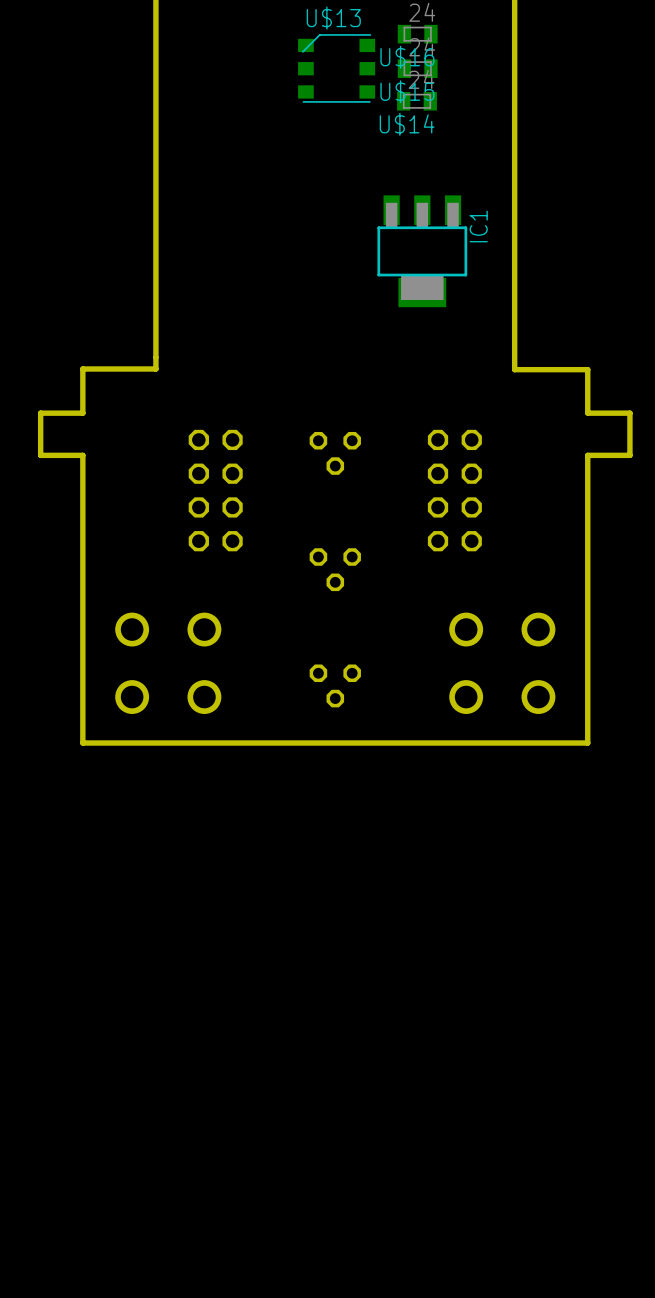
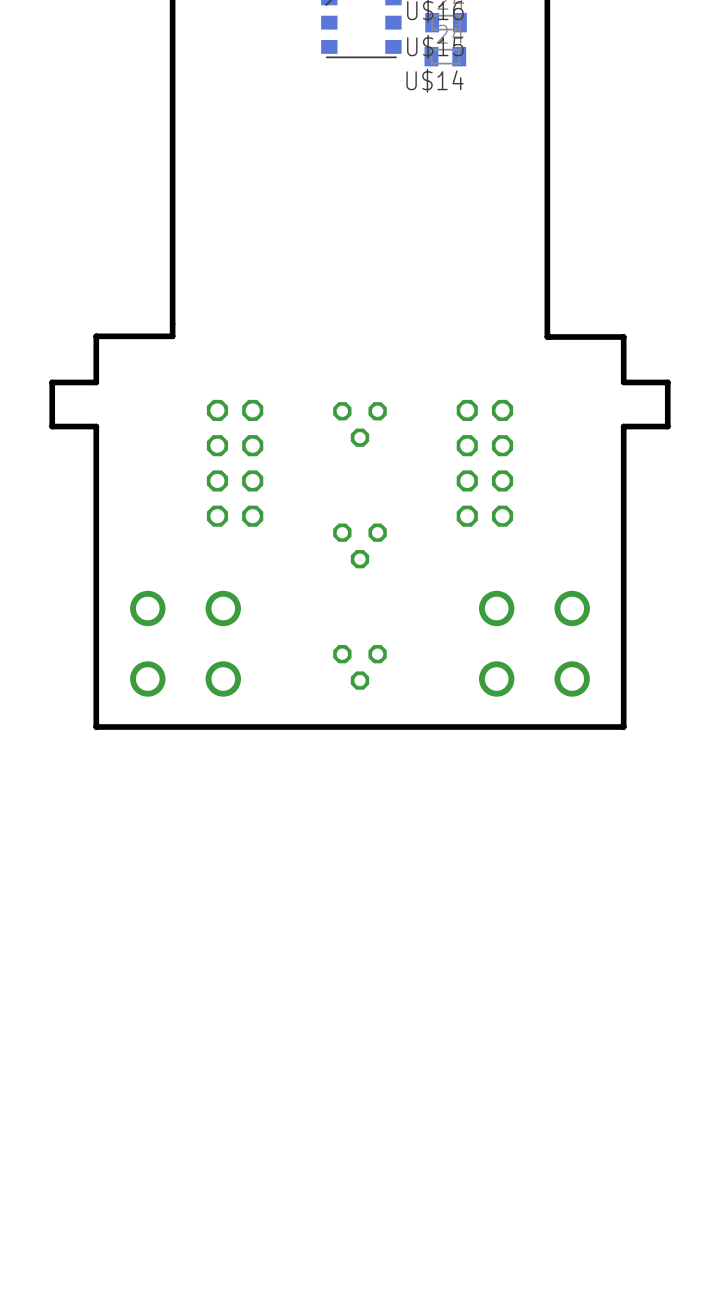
IC1: (422, 251) -> none

